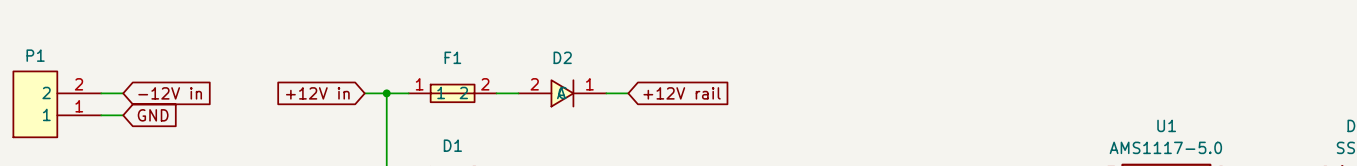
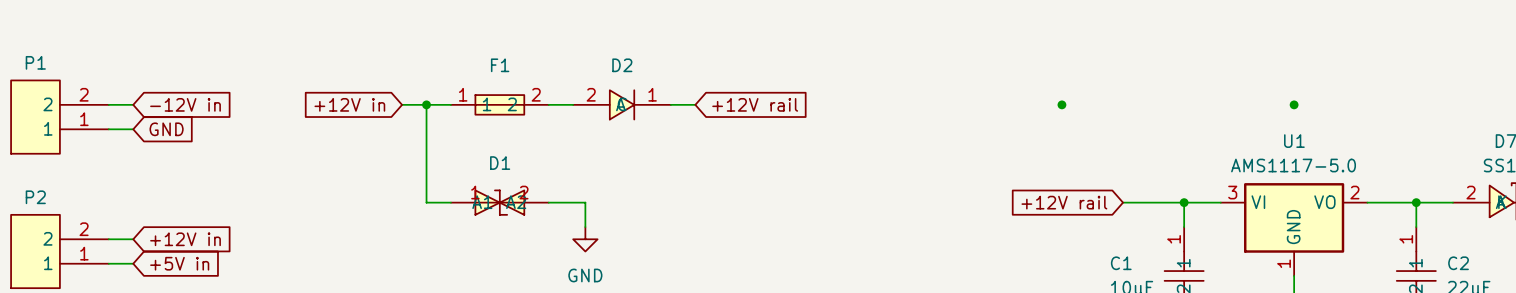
junction: none -> (1061, 104)
junction: none -> (1294, 104)

